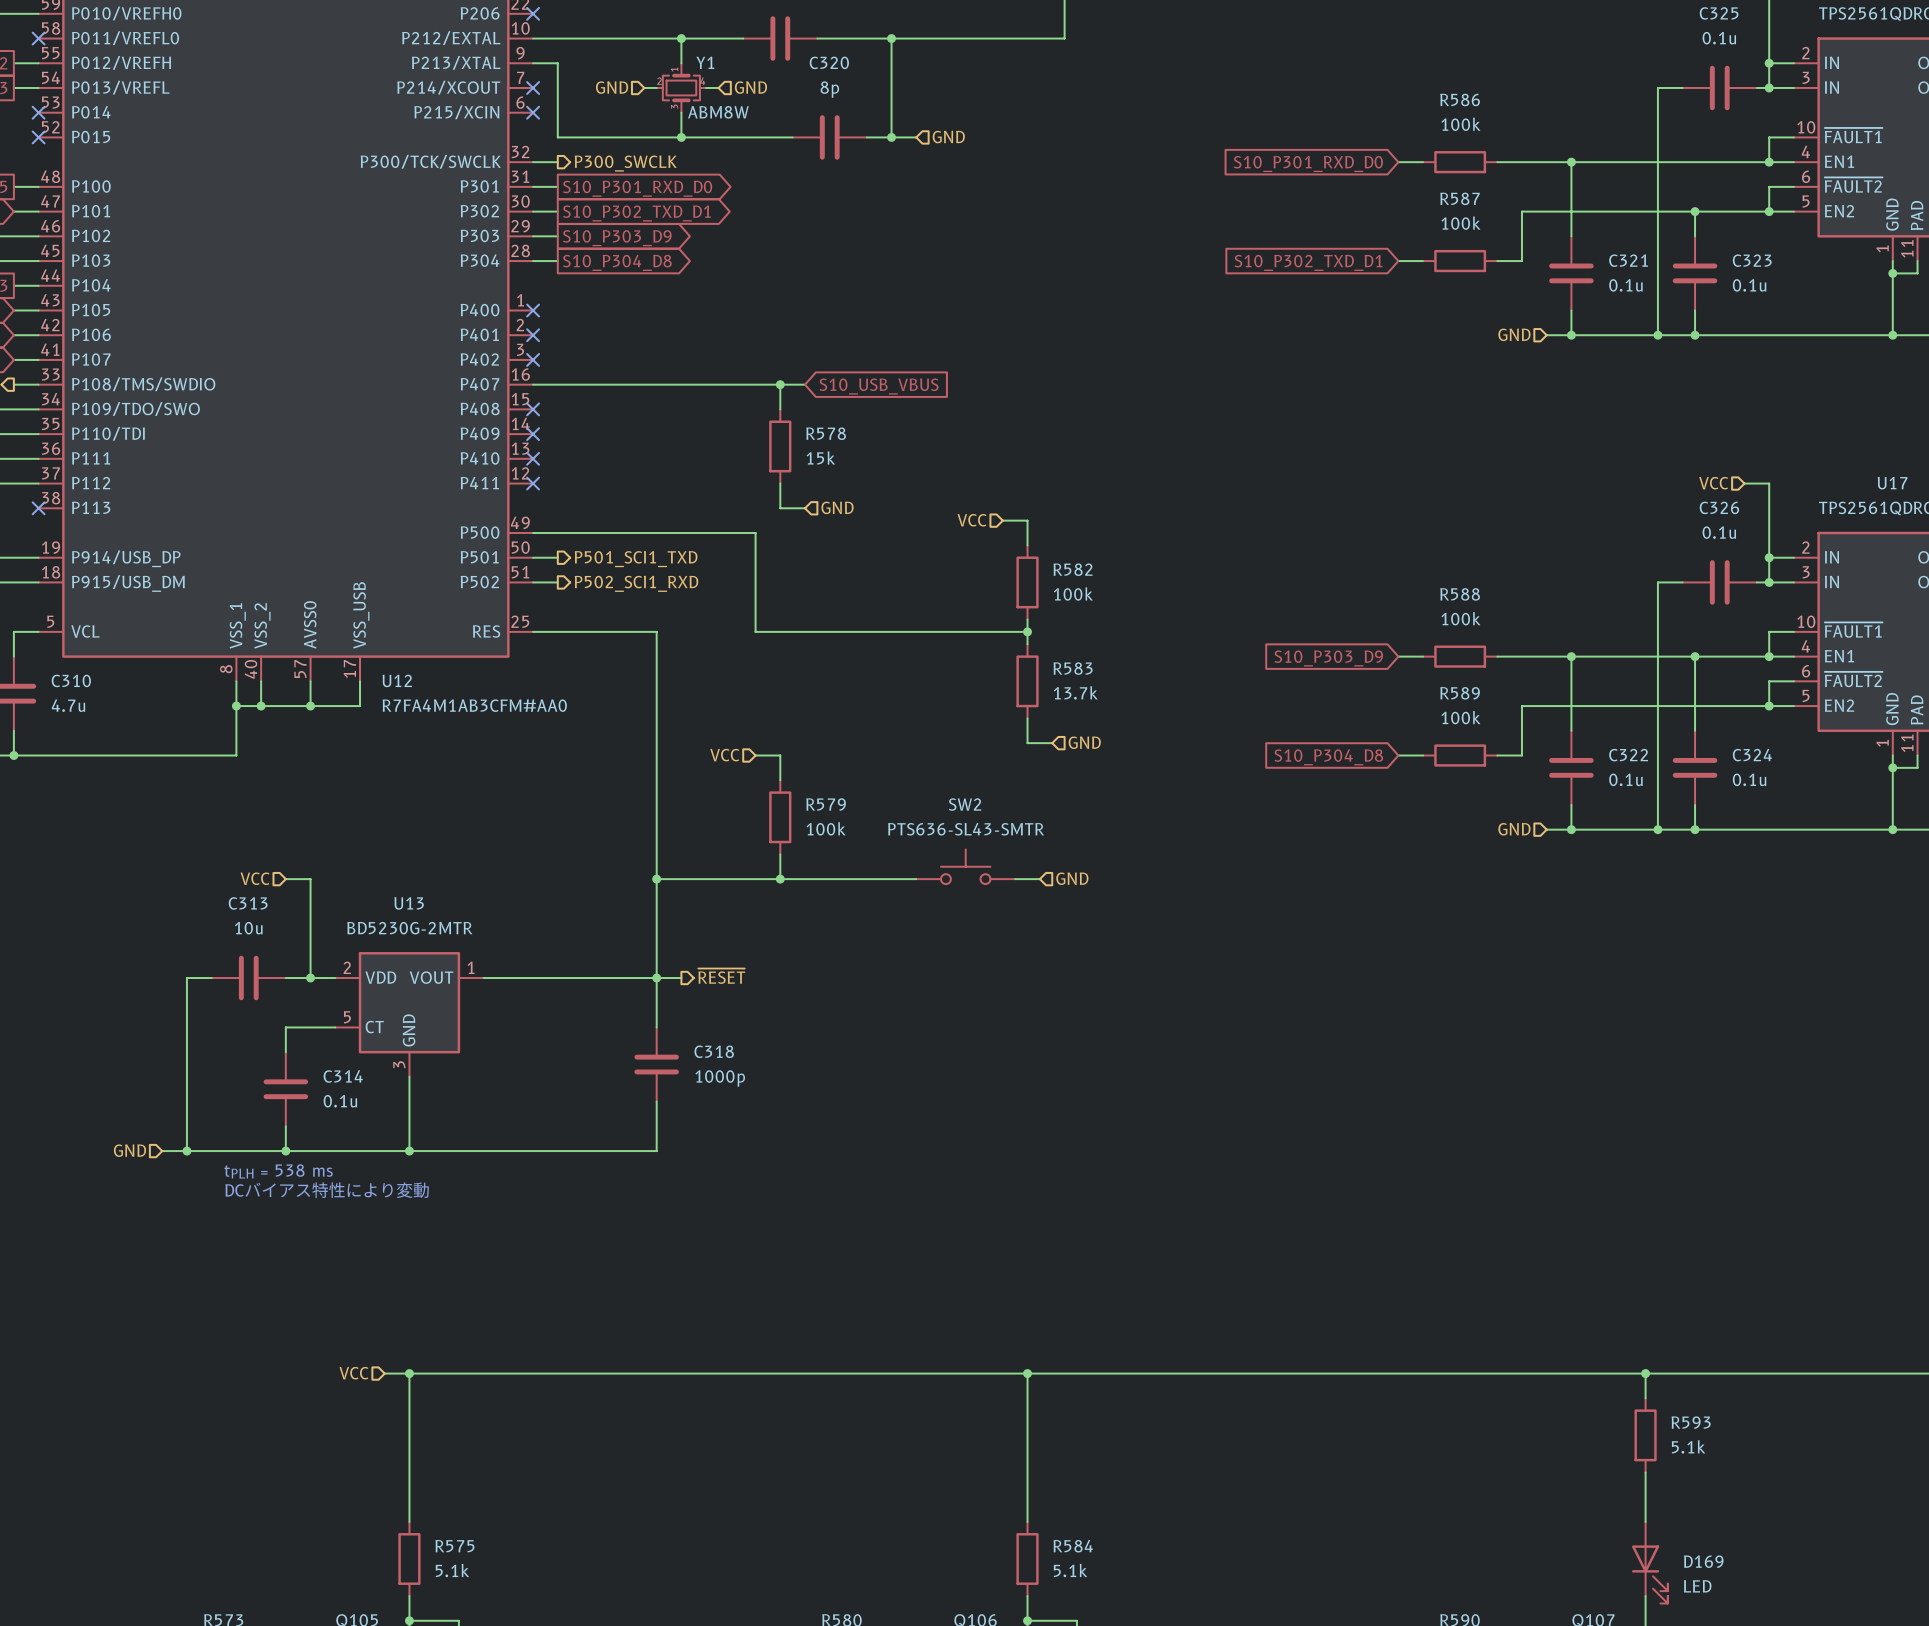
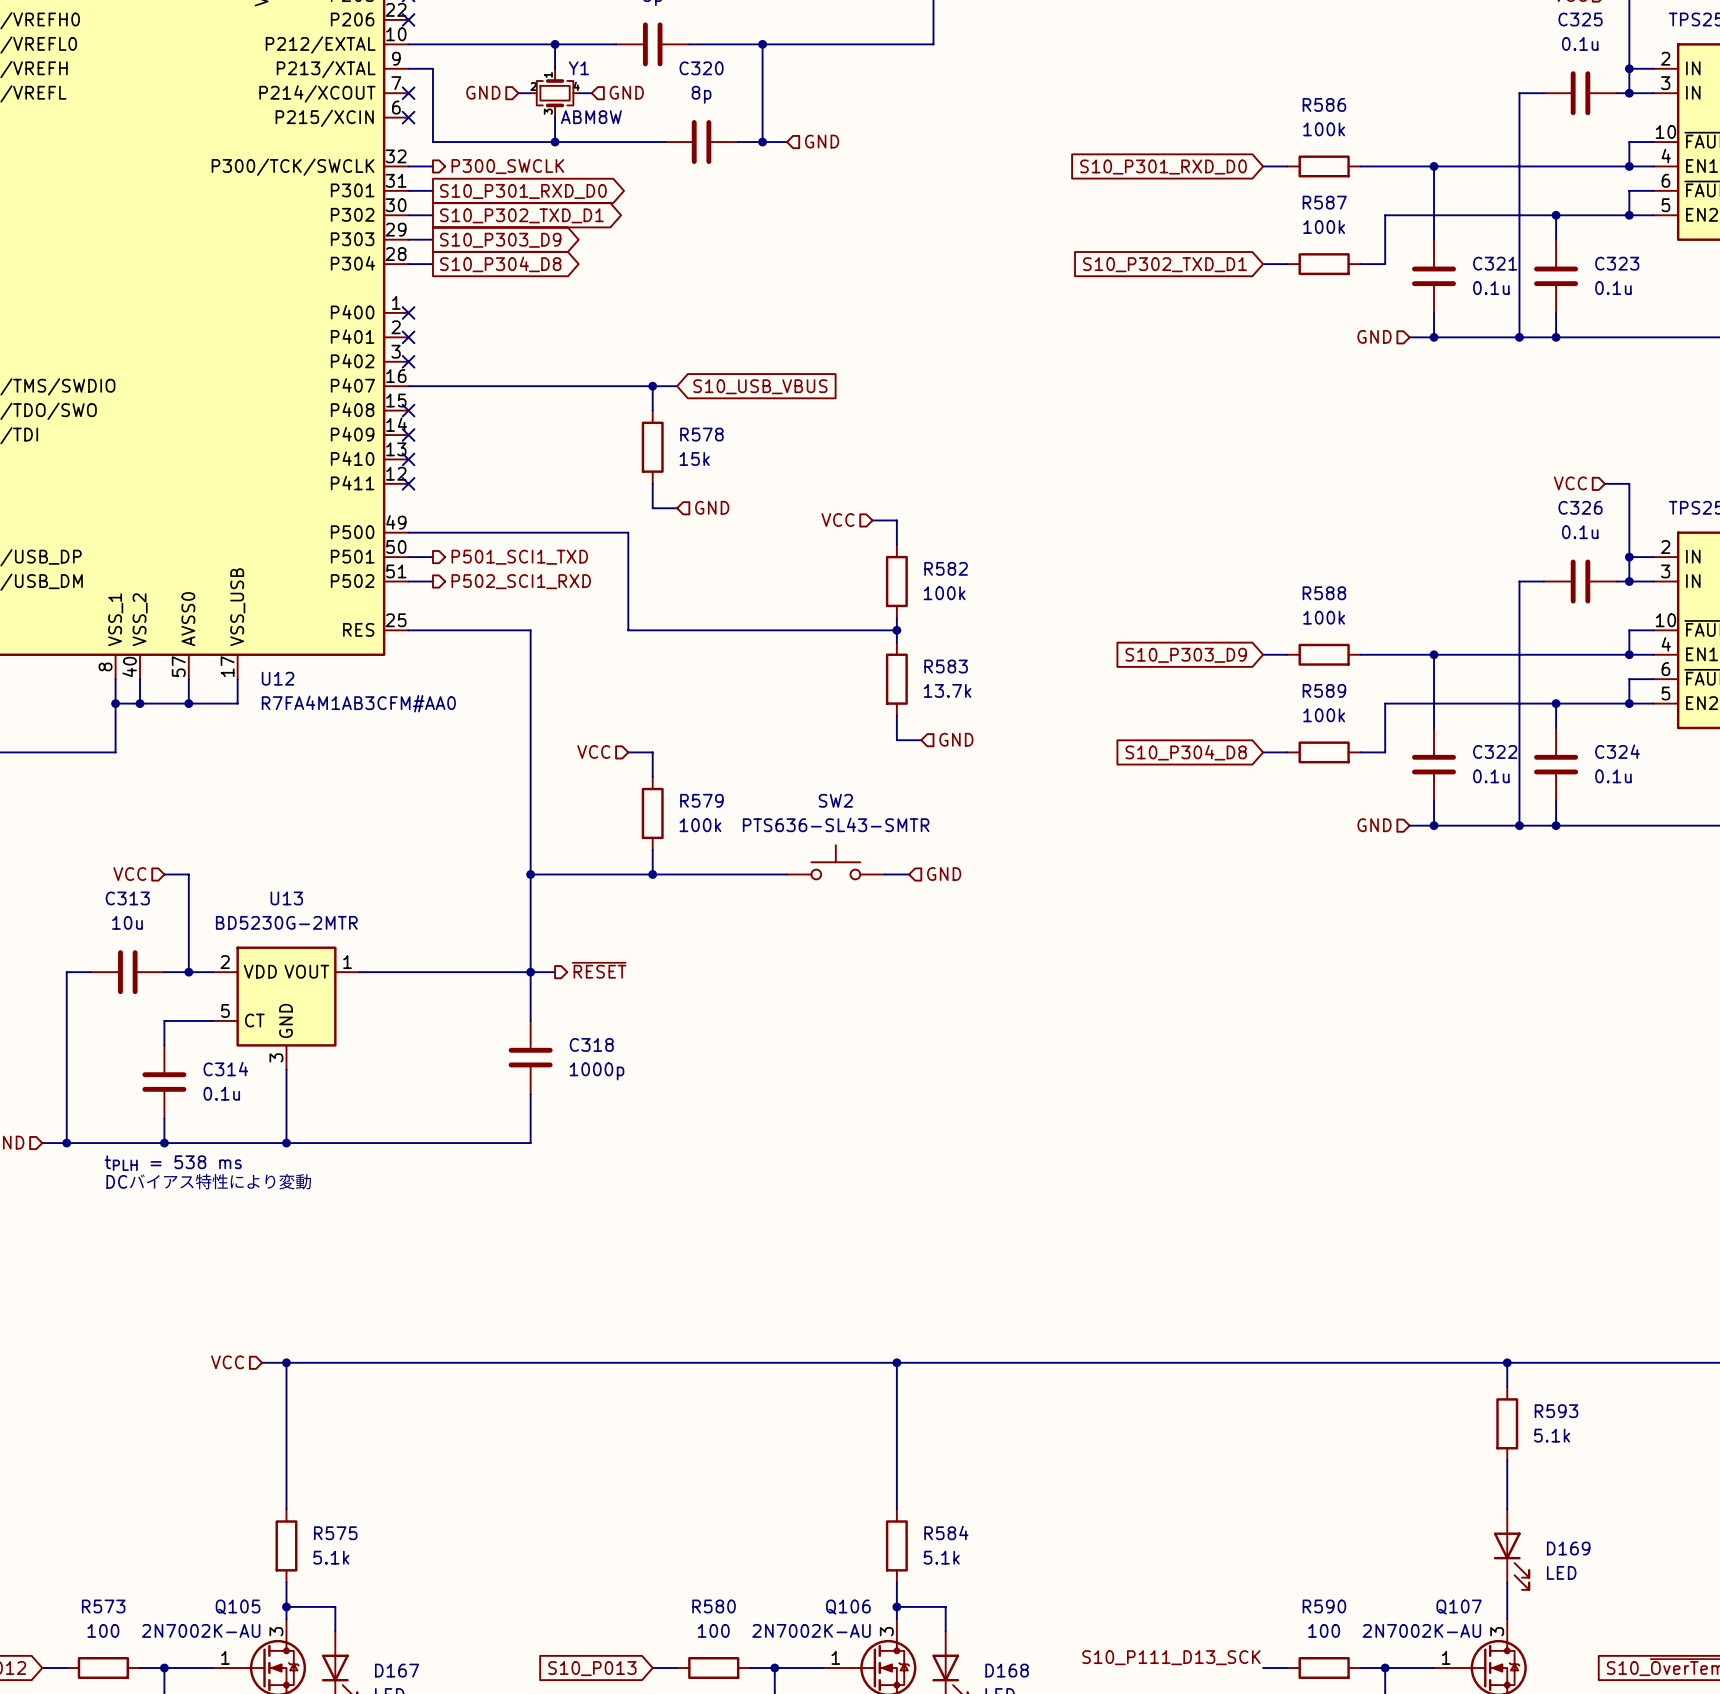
wire: (1695, 656) (1695, 706) -> none
junction position: (1695, 656) -> (1556, 703)

